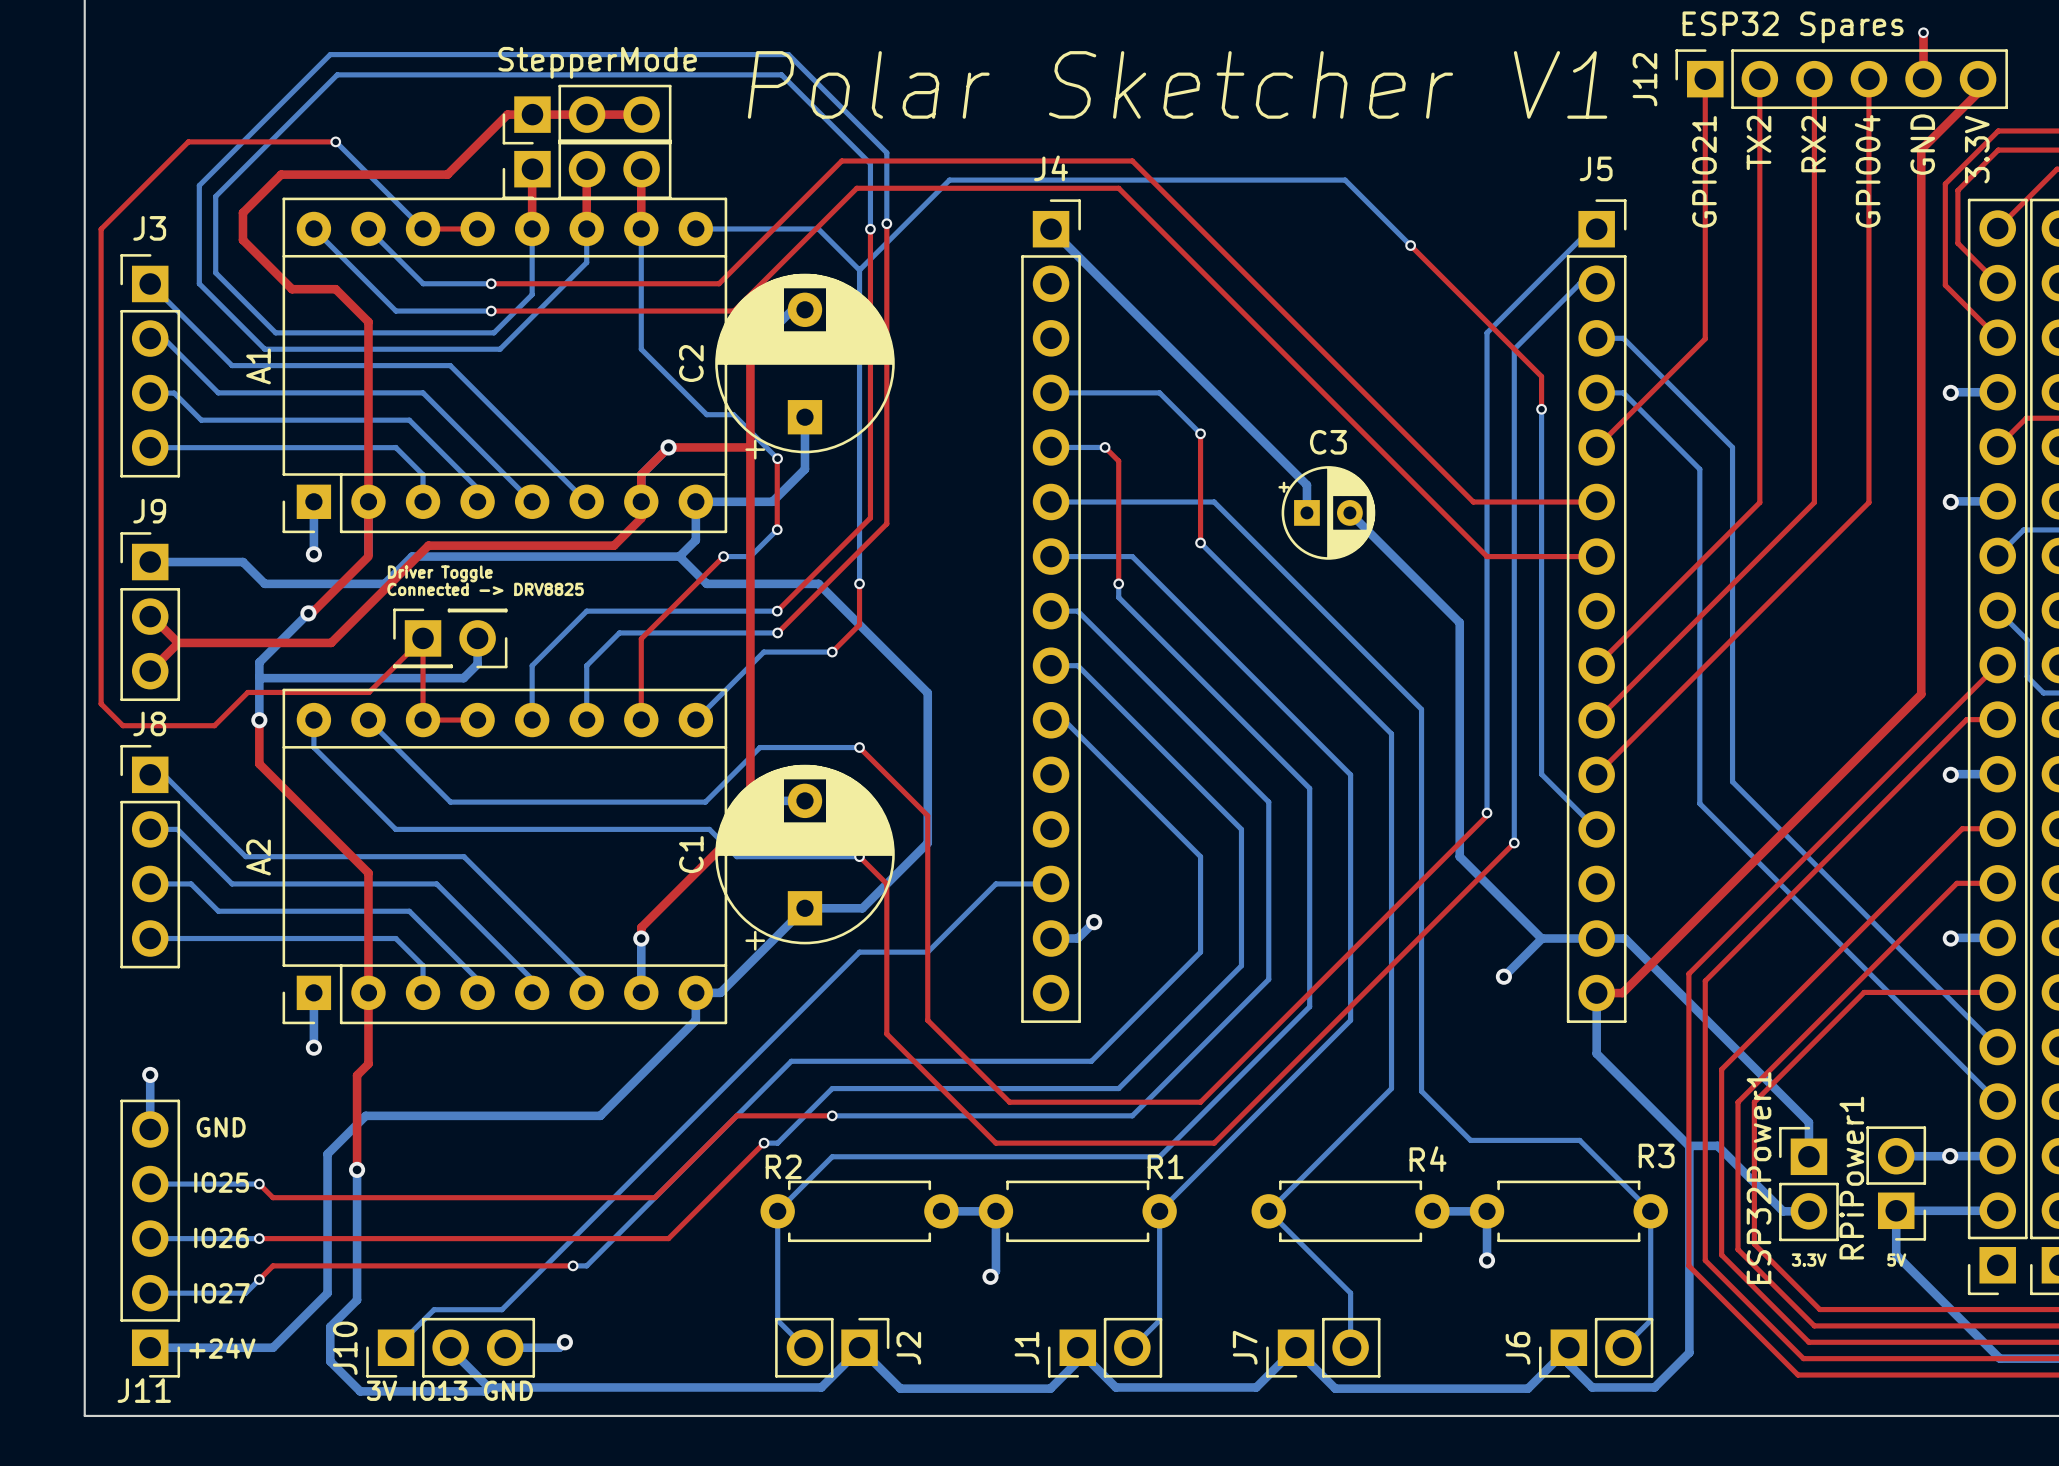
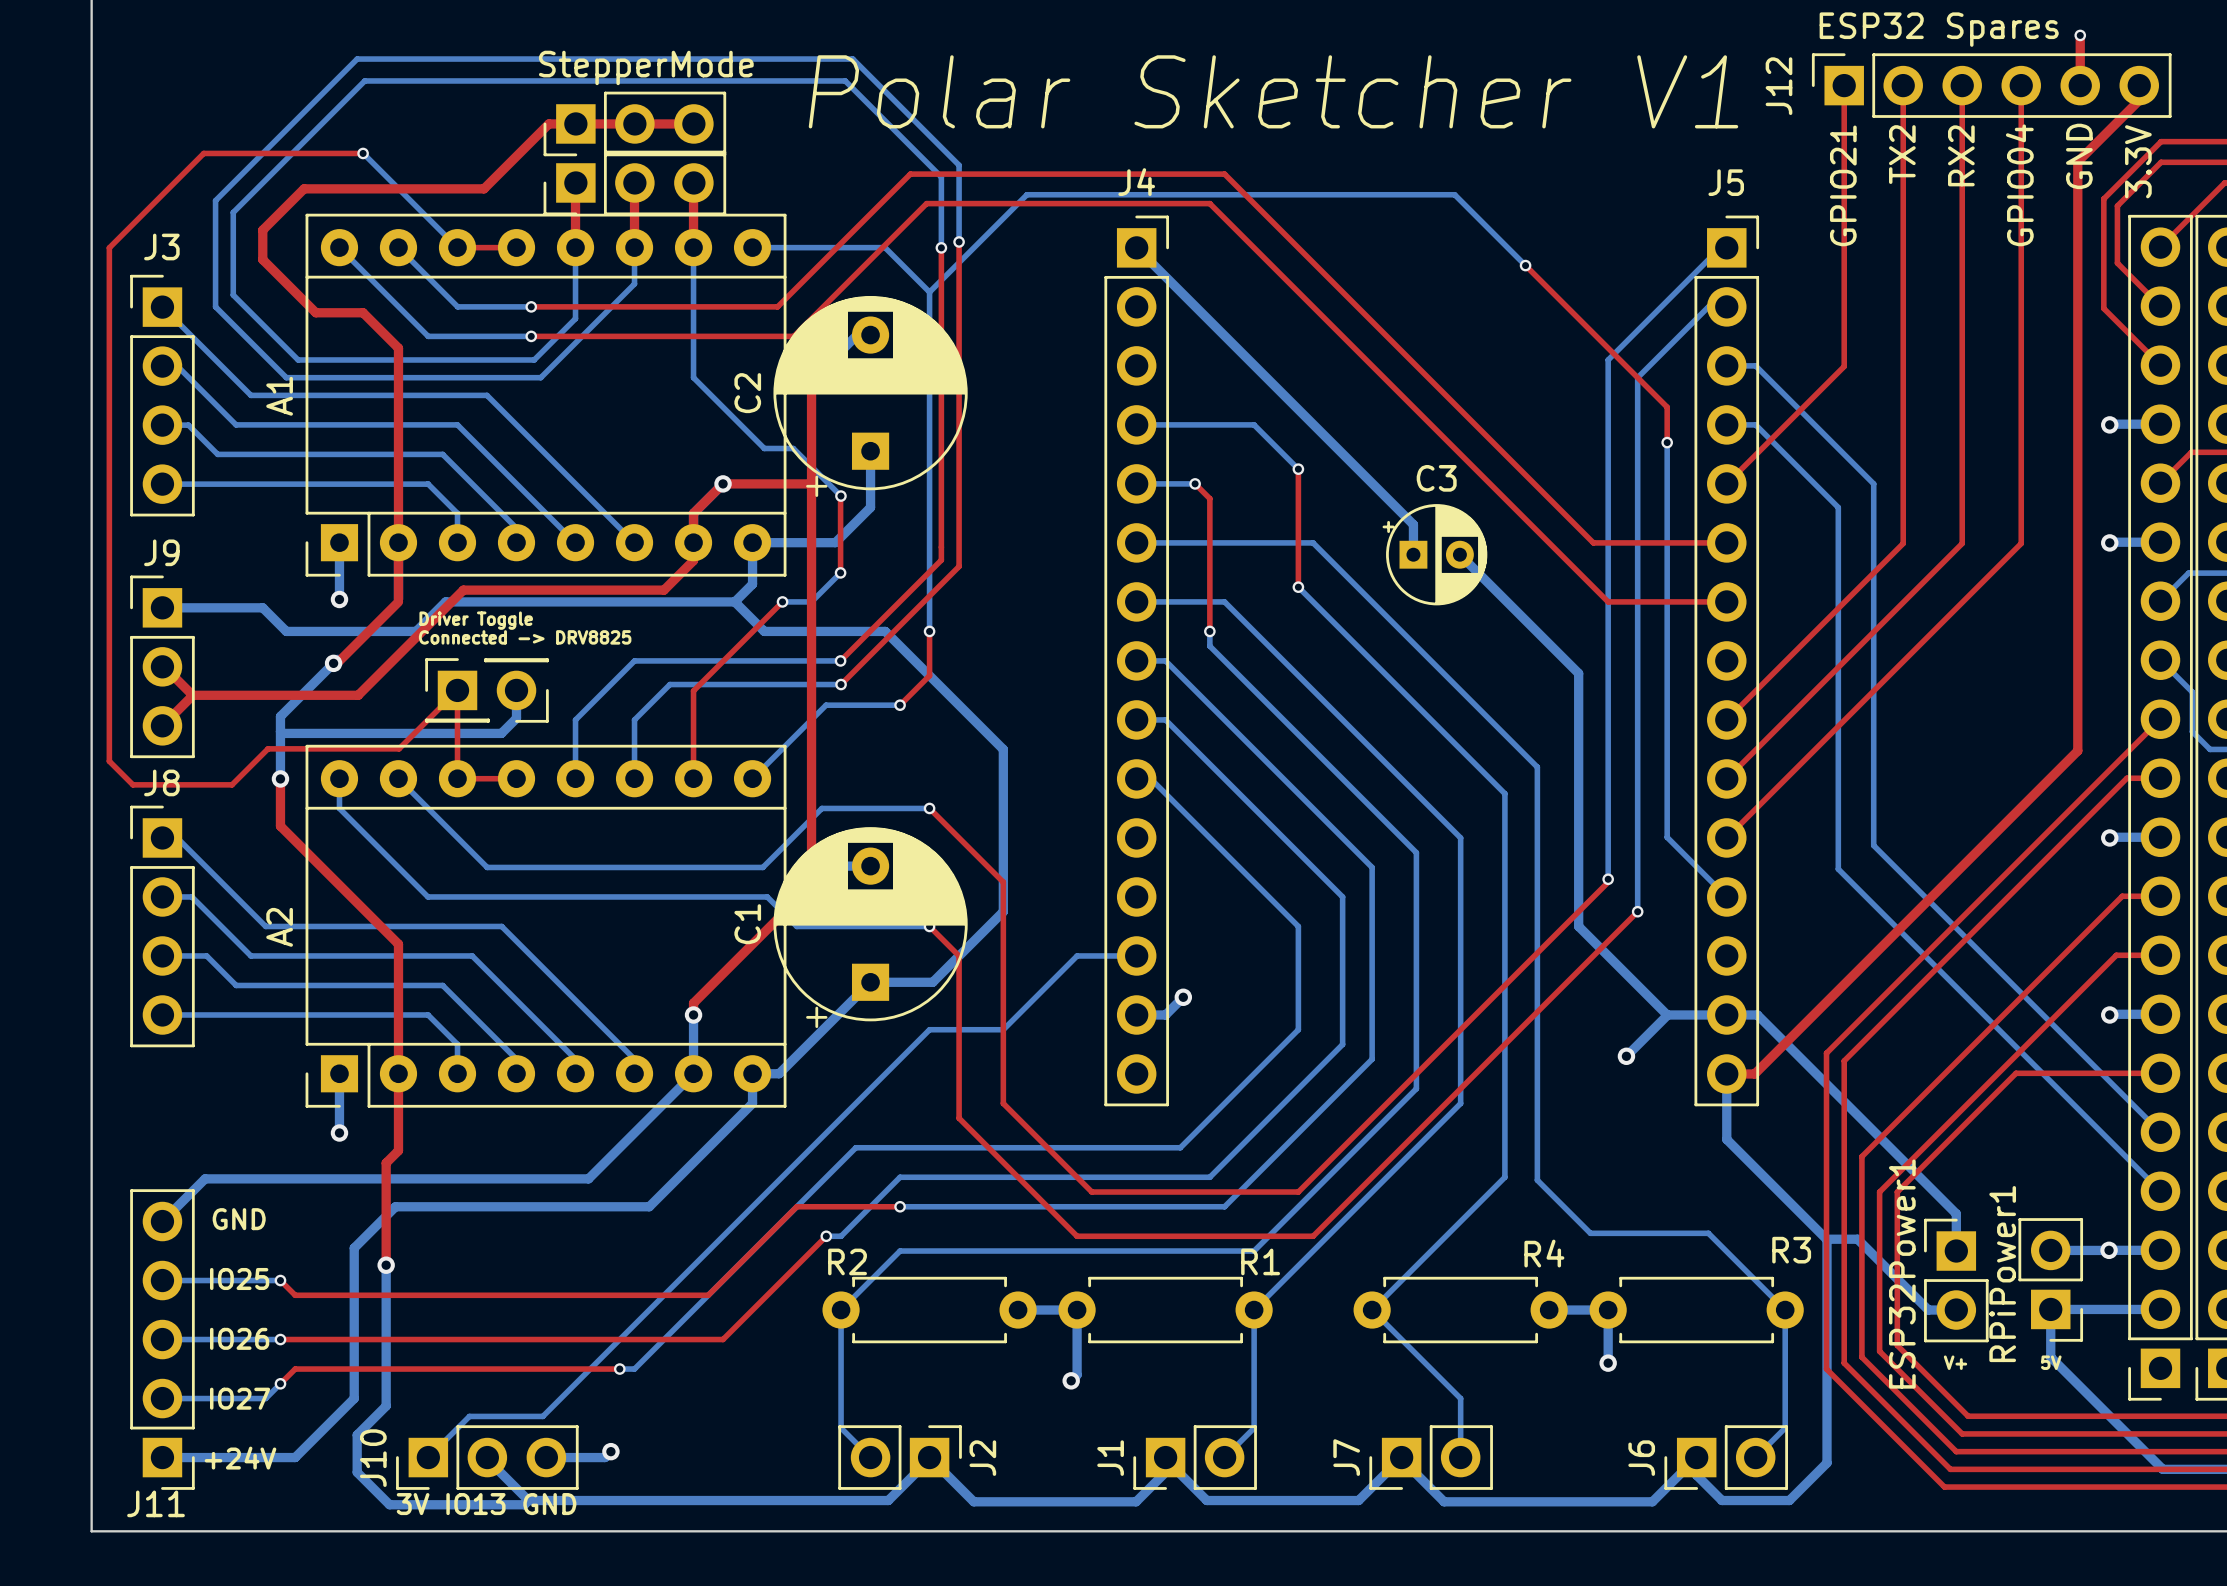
bottom track: (150, 1074) (150, 1129) -> (693, 1073) (588, 1178) (205, 1178) (162, 1221)
via: (150, 1074) -> none
ESP32Power1 value: 3.3V (1809, 1260) -> V+ (1955, 1362)

